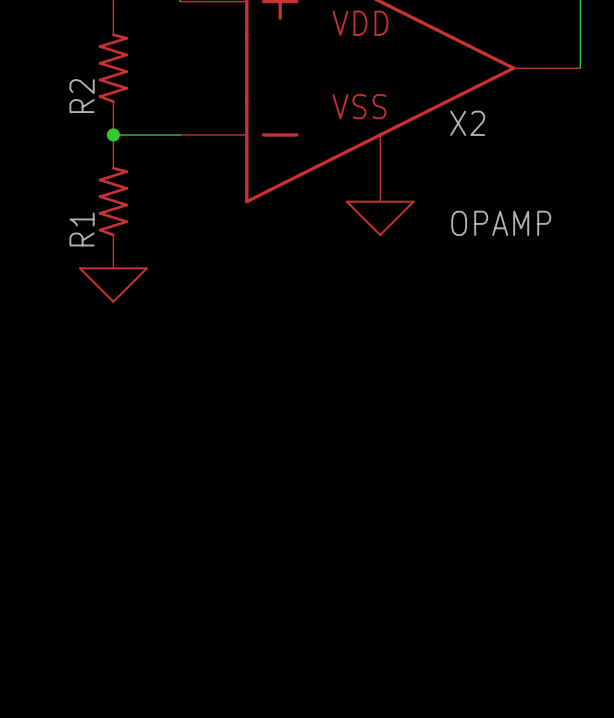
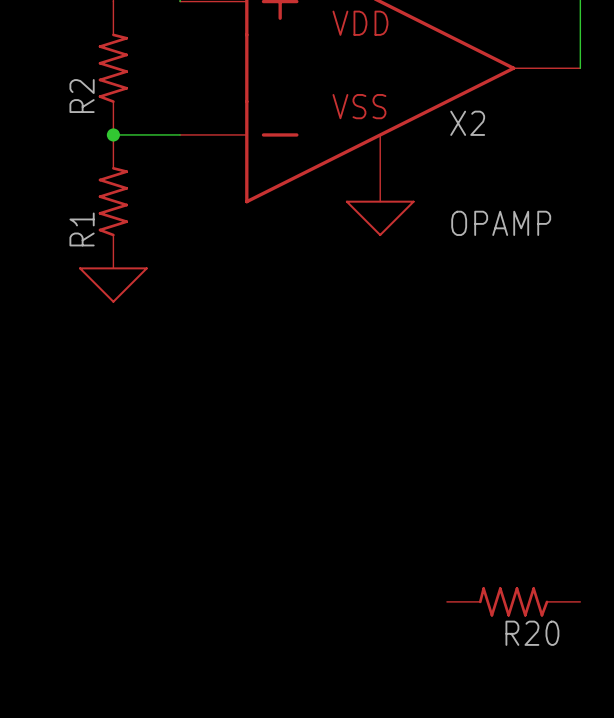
R20: none -> (513, 601)

